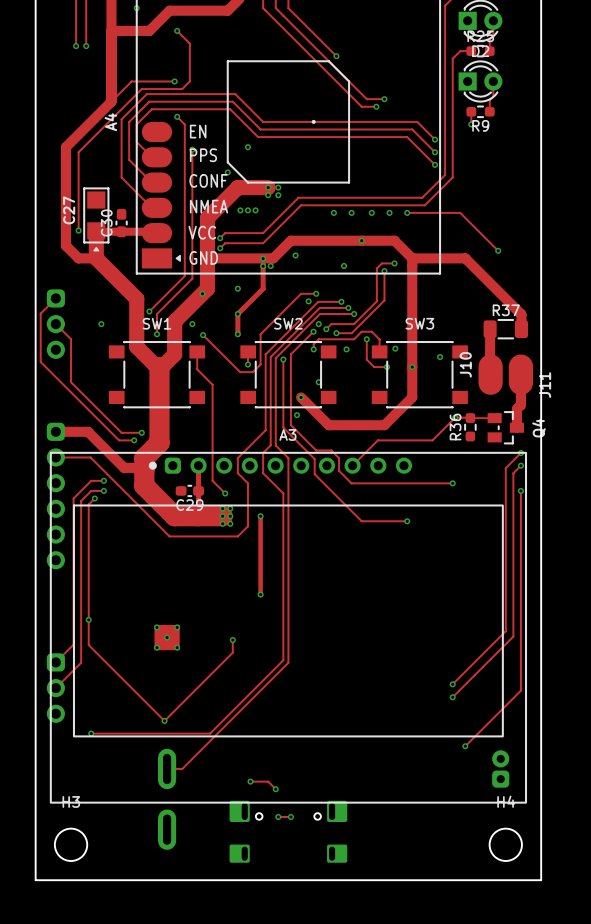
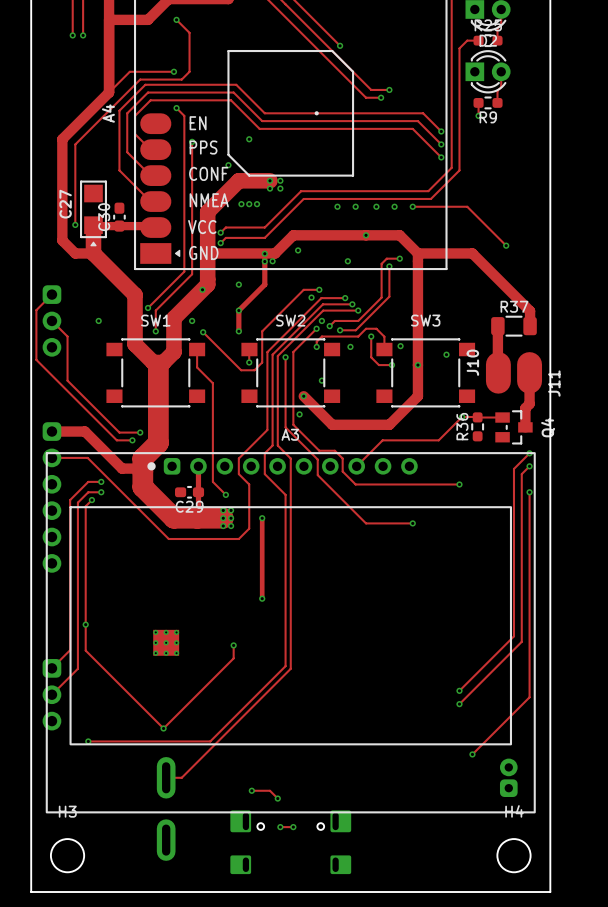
part footprint: [153, 624, 181, 651] -> [153, 629, 180, 656]

